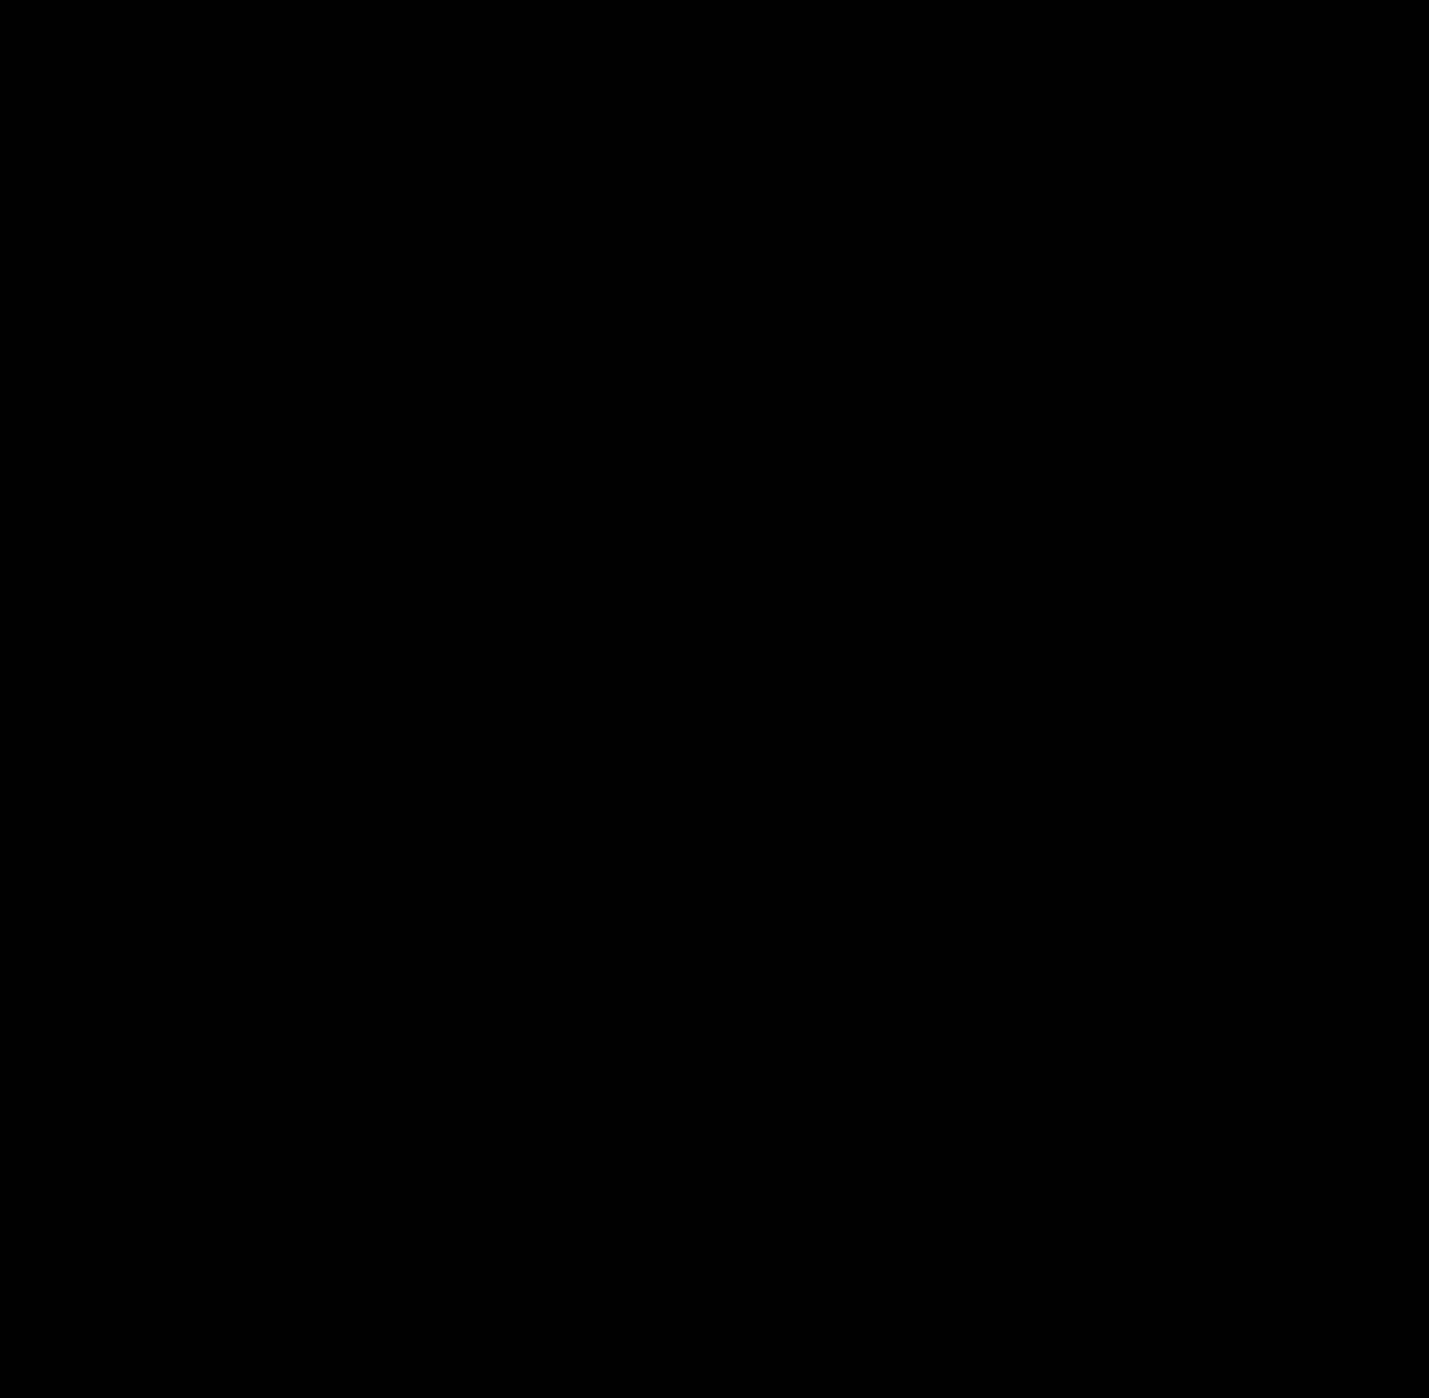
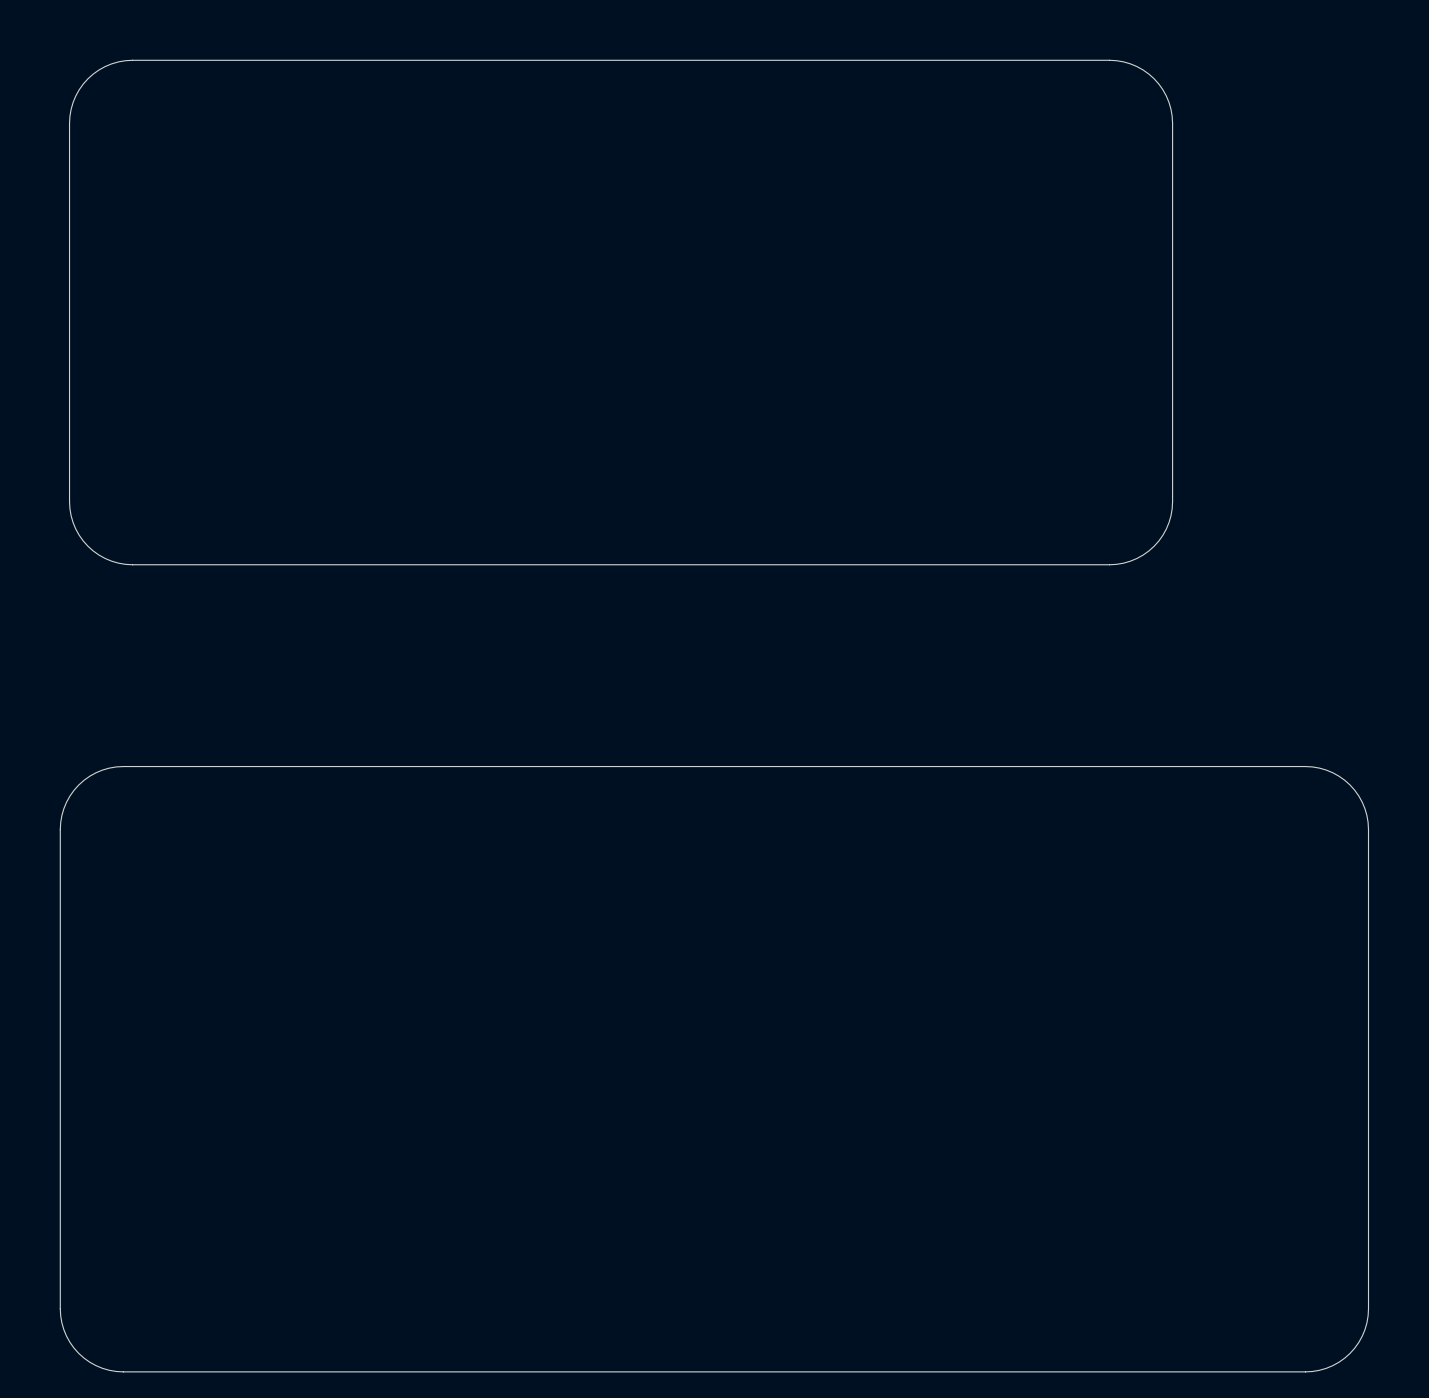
board edge: none -> (132, 60) (1109, 60) (1123, 61) (1136, 66) (1148, 74) (1158, 84) (1169, 102) (1172, 116) (1172, 501) (1171, 515) (1166, 529) (1158, 541) (1143, 555) (1130, 561) (1109, 564) (132, 564) (118, 563) (105, 558) (93, 550) (83, 541) (73, 522) (69, 508) (69, 123) (71, 109) (75, 95) (88, 78) (99, 69) (111, 63) (132, 60)
board edge: none -> (123, 766) (1305, 766) (1319, 768) (1332, 772) (1350, 785) (1358, 796) (1366, 815) (1368, 829) (1368, 1308) (1366, 1322) (1362, 1336) (1350, 1353) (1339, 1362) (1326, 1368) (1305, 1371) (123, 1371) (109, 1370) (95, 1365) (84, 1358) (74, 1348) (66, 1336) (60, 1315) (60, 829) (63, 808) (69, 796) (78, 785) (89, 776) (102, 770) (123, 766)

